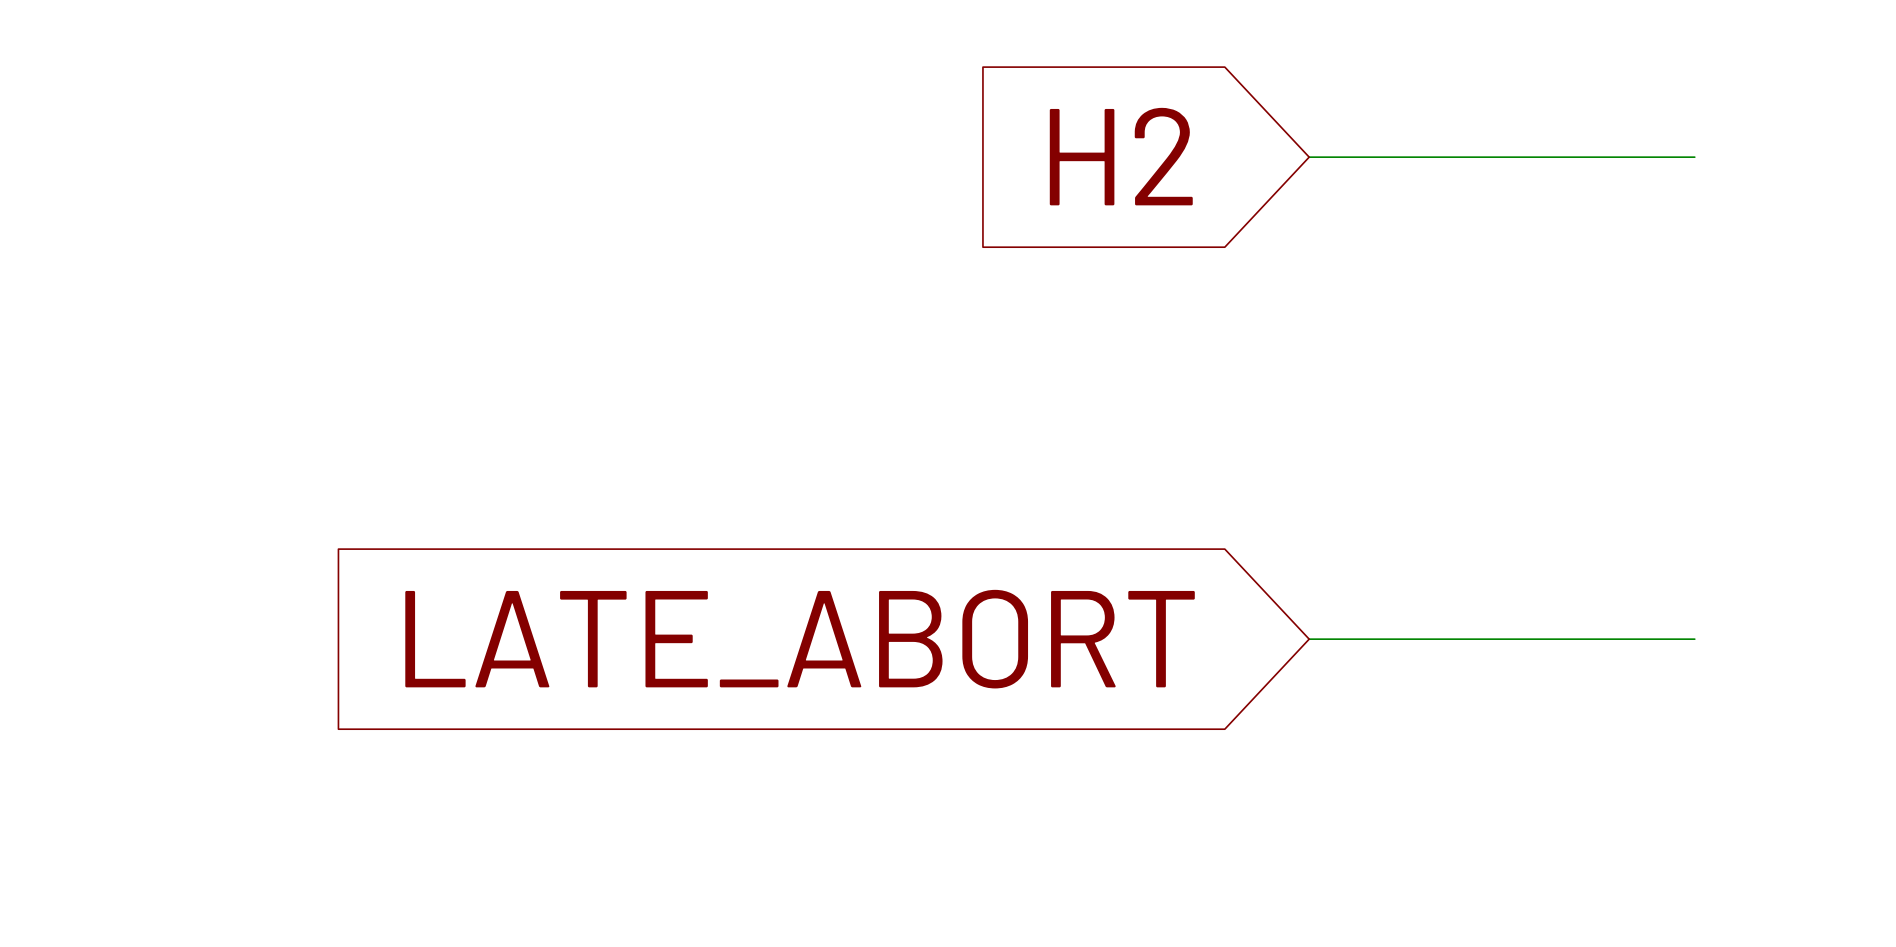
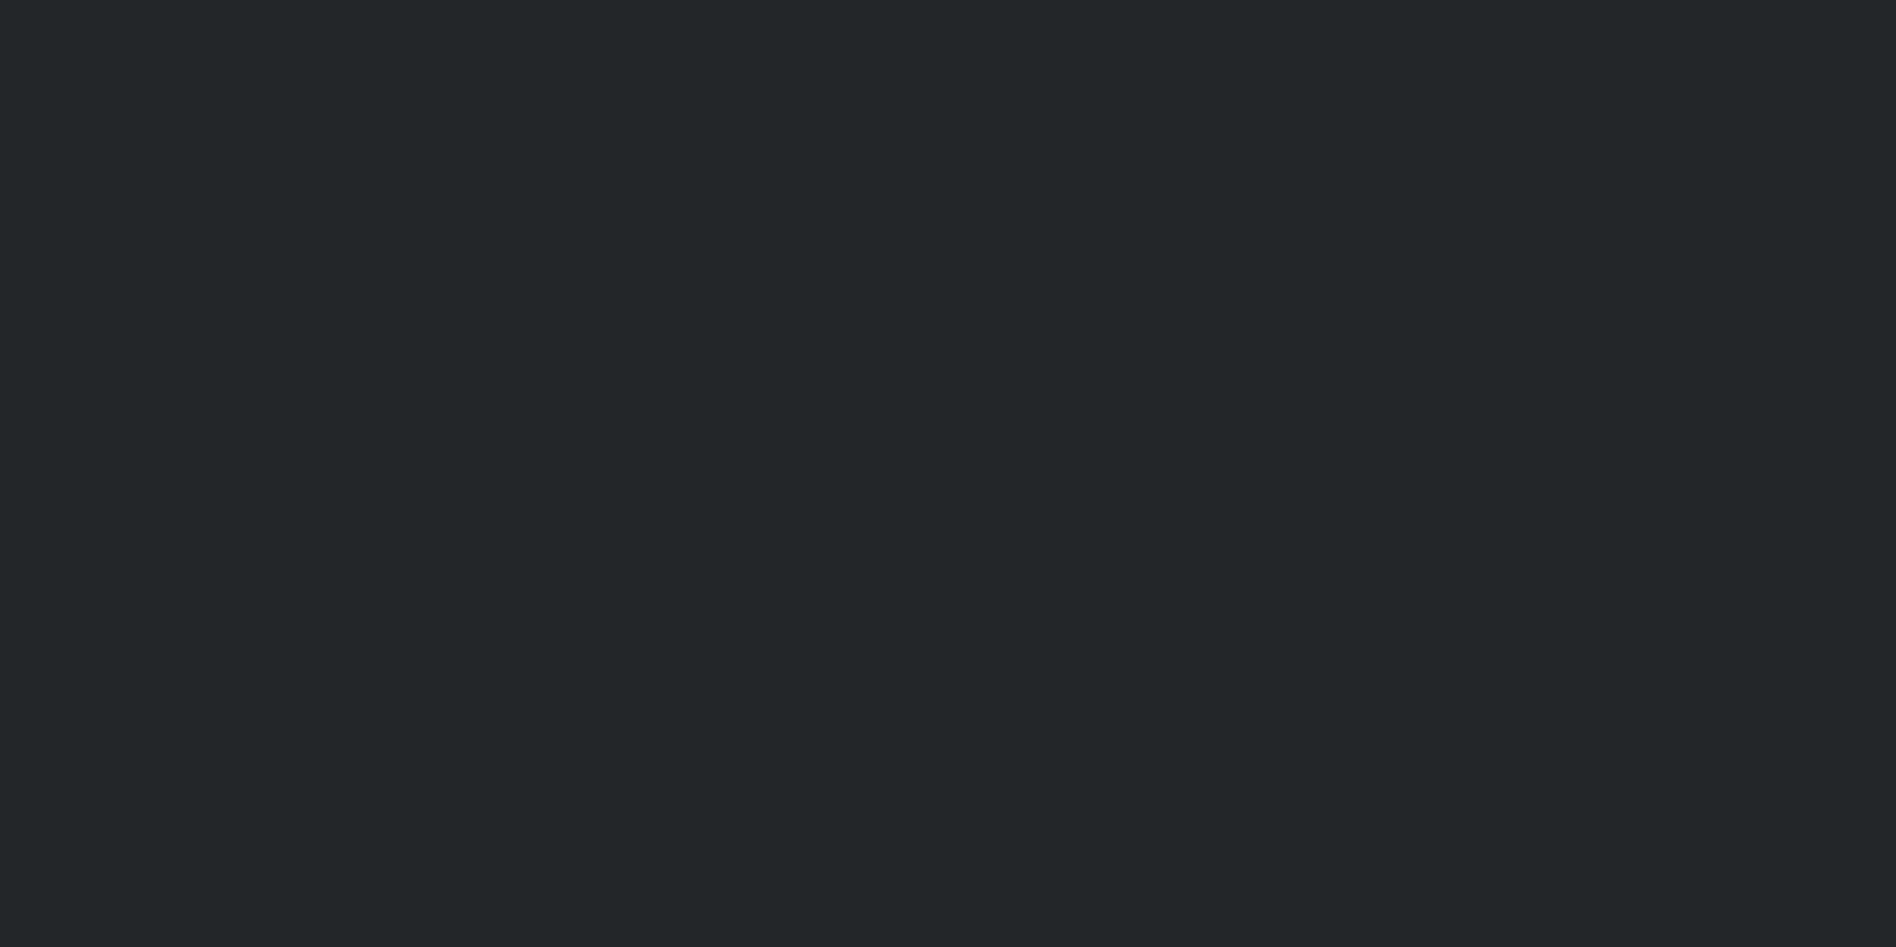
global label: H2 (1121, 156) -> none
wire: (1309, 157) (1694, 157) -> none
global label: LATE_ABORT (800, 639) -> none
wire: (1309, 639) (1694, 639) -> none

